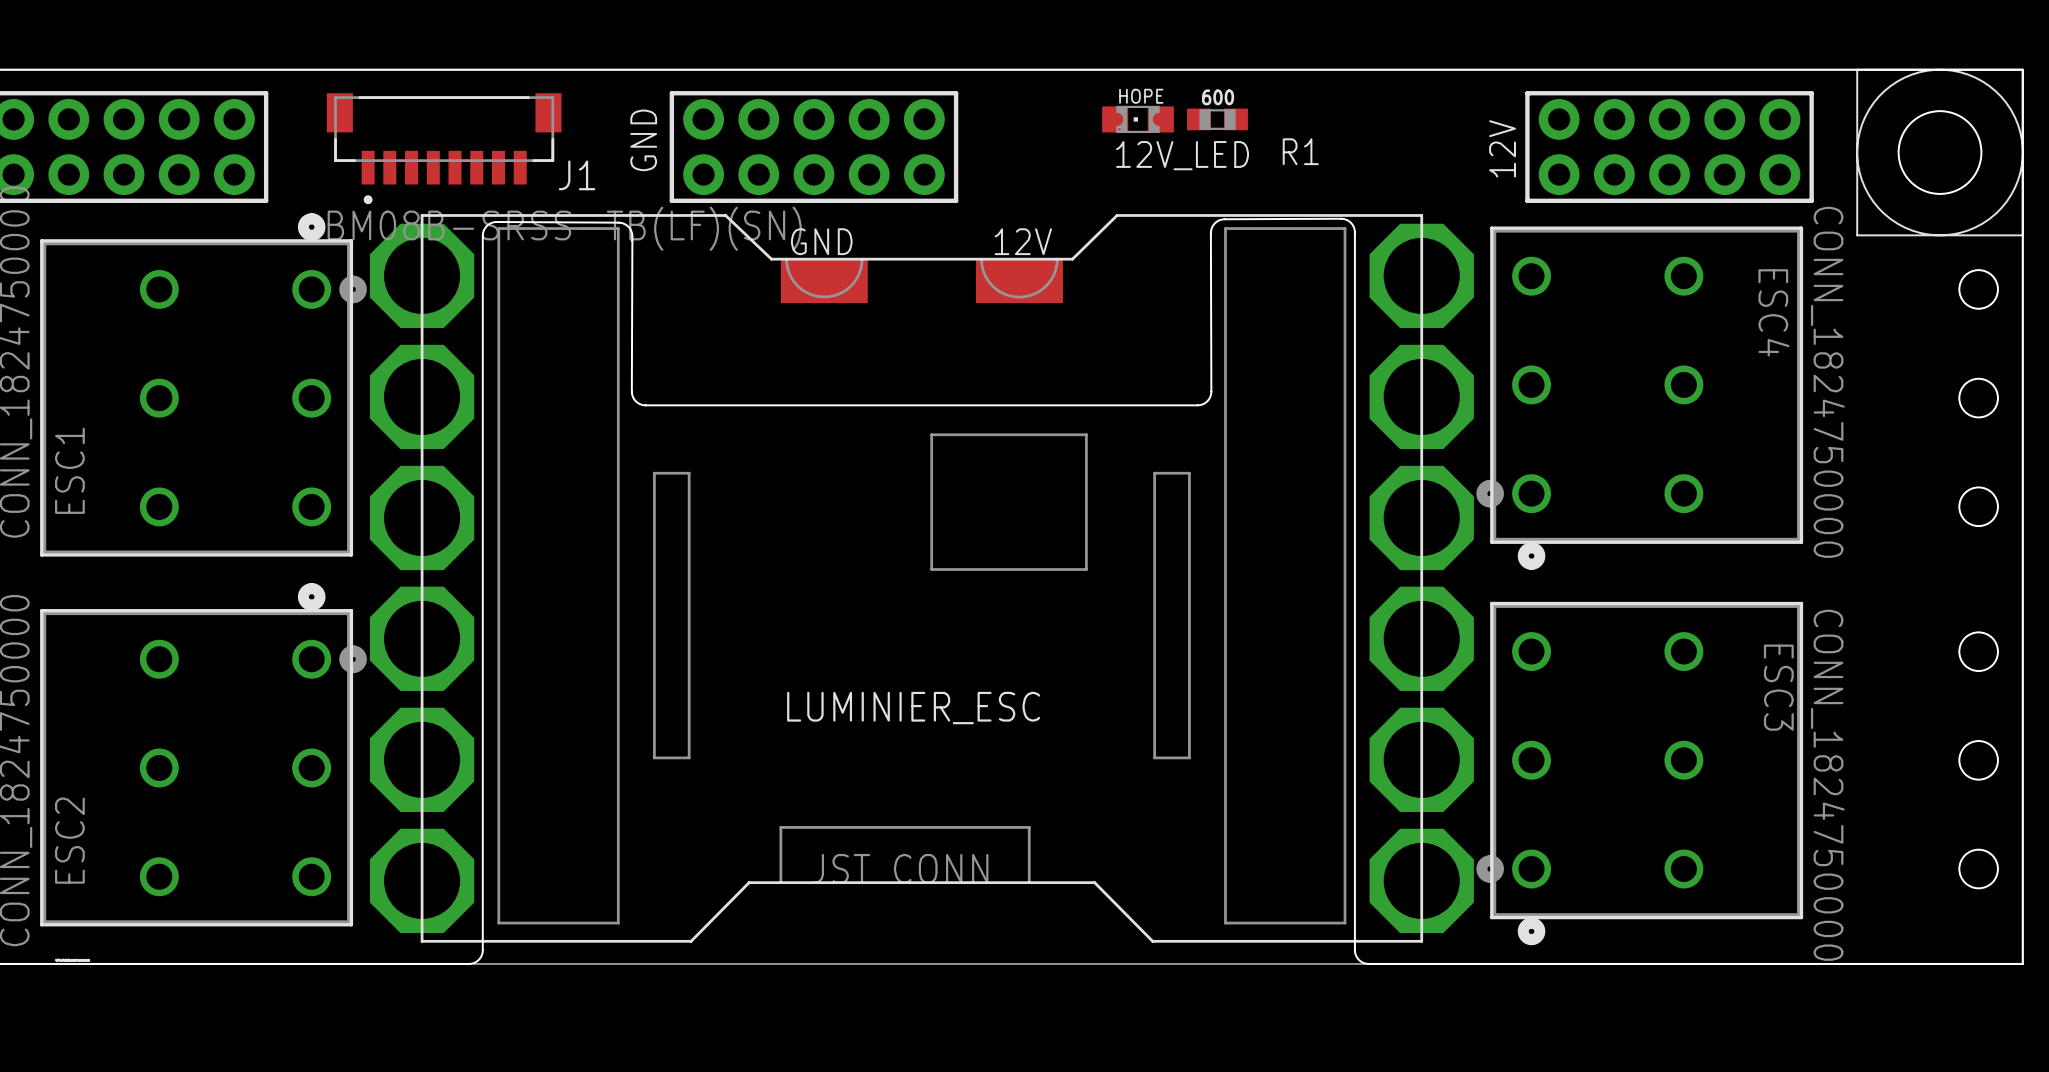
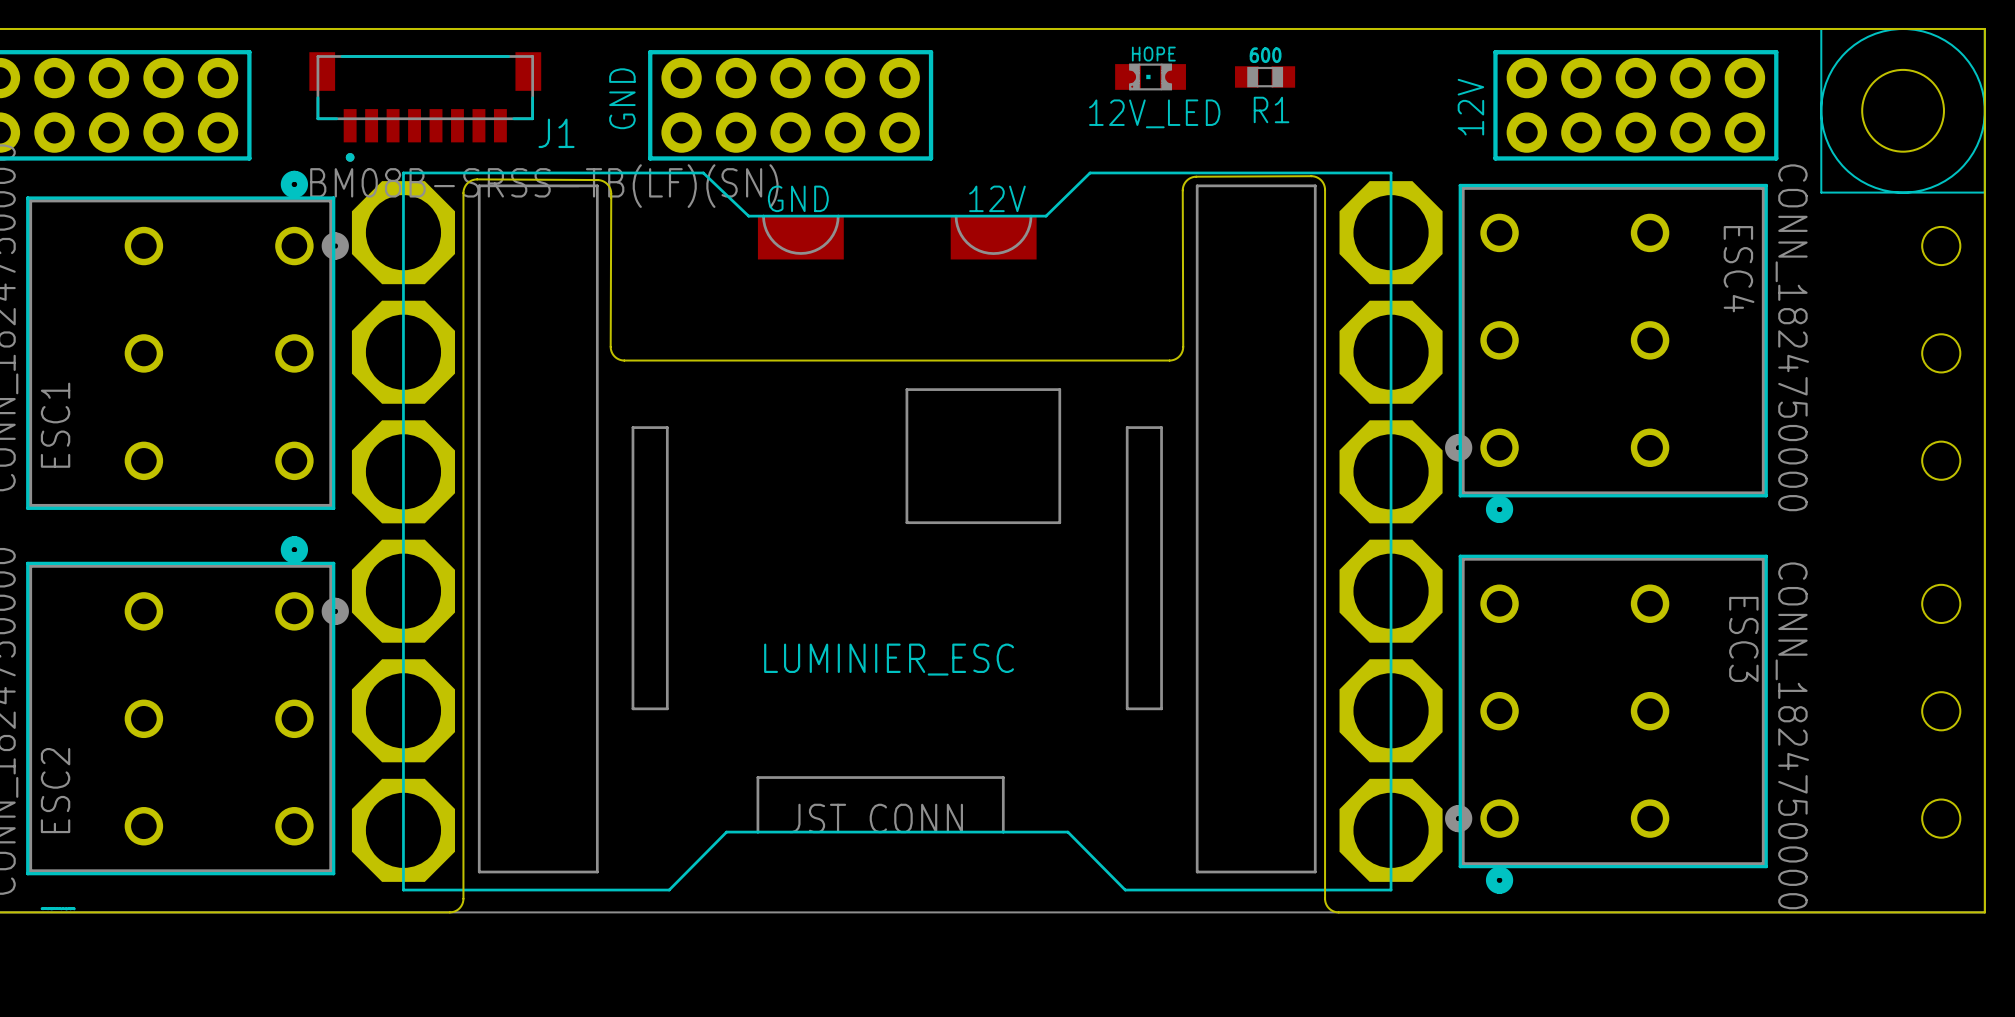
HOPE position: (1137, 119) -> (1150, 76)
600 position: (1217, 119) -> (1265, 76)

